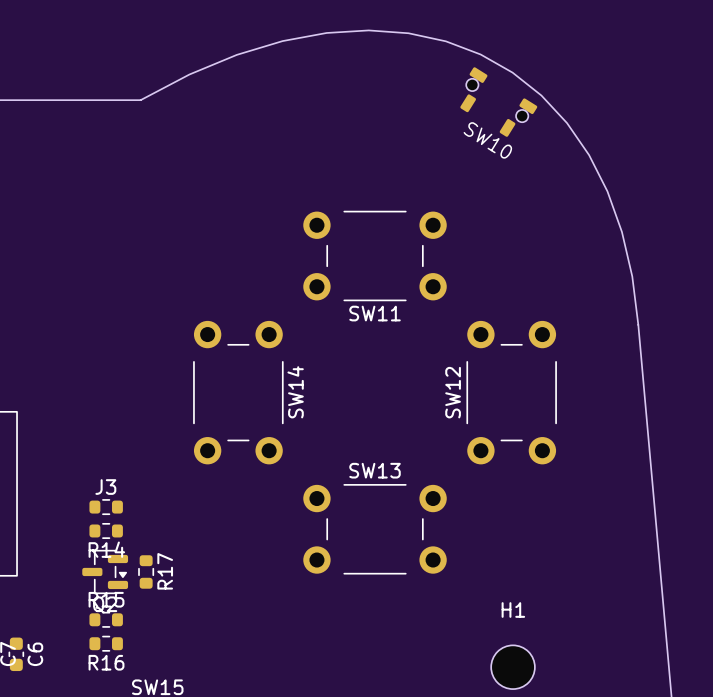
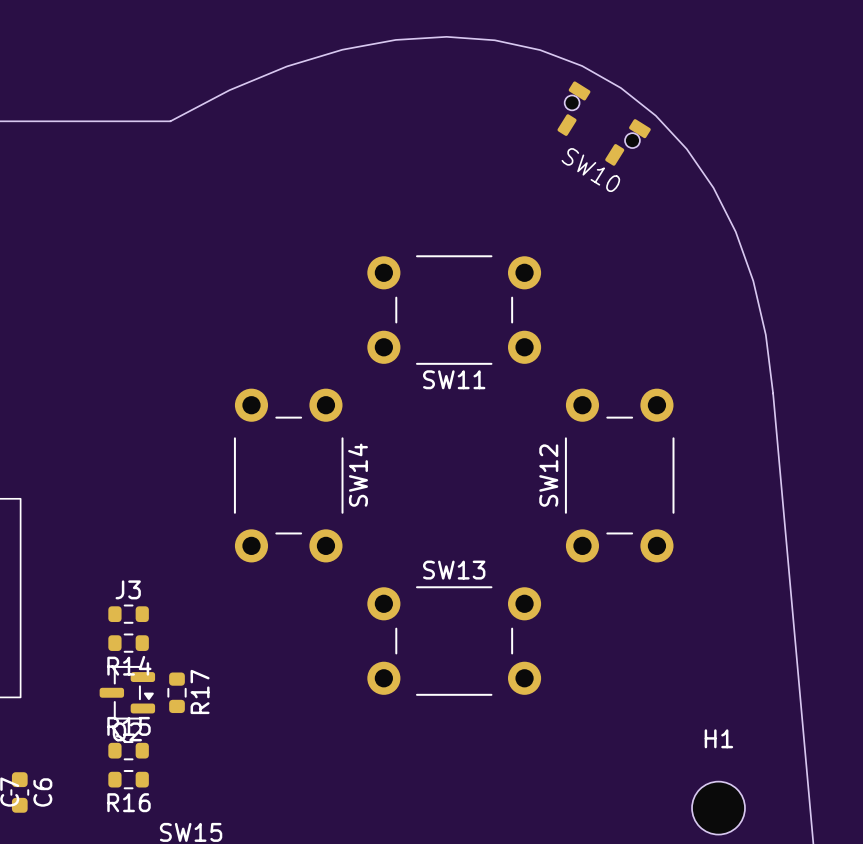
H1 position: (513, 667) -> (718, 808)

